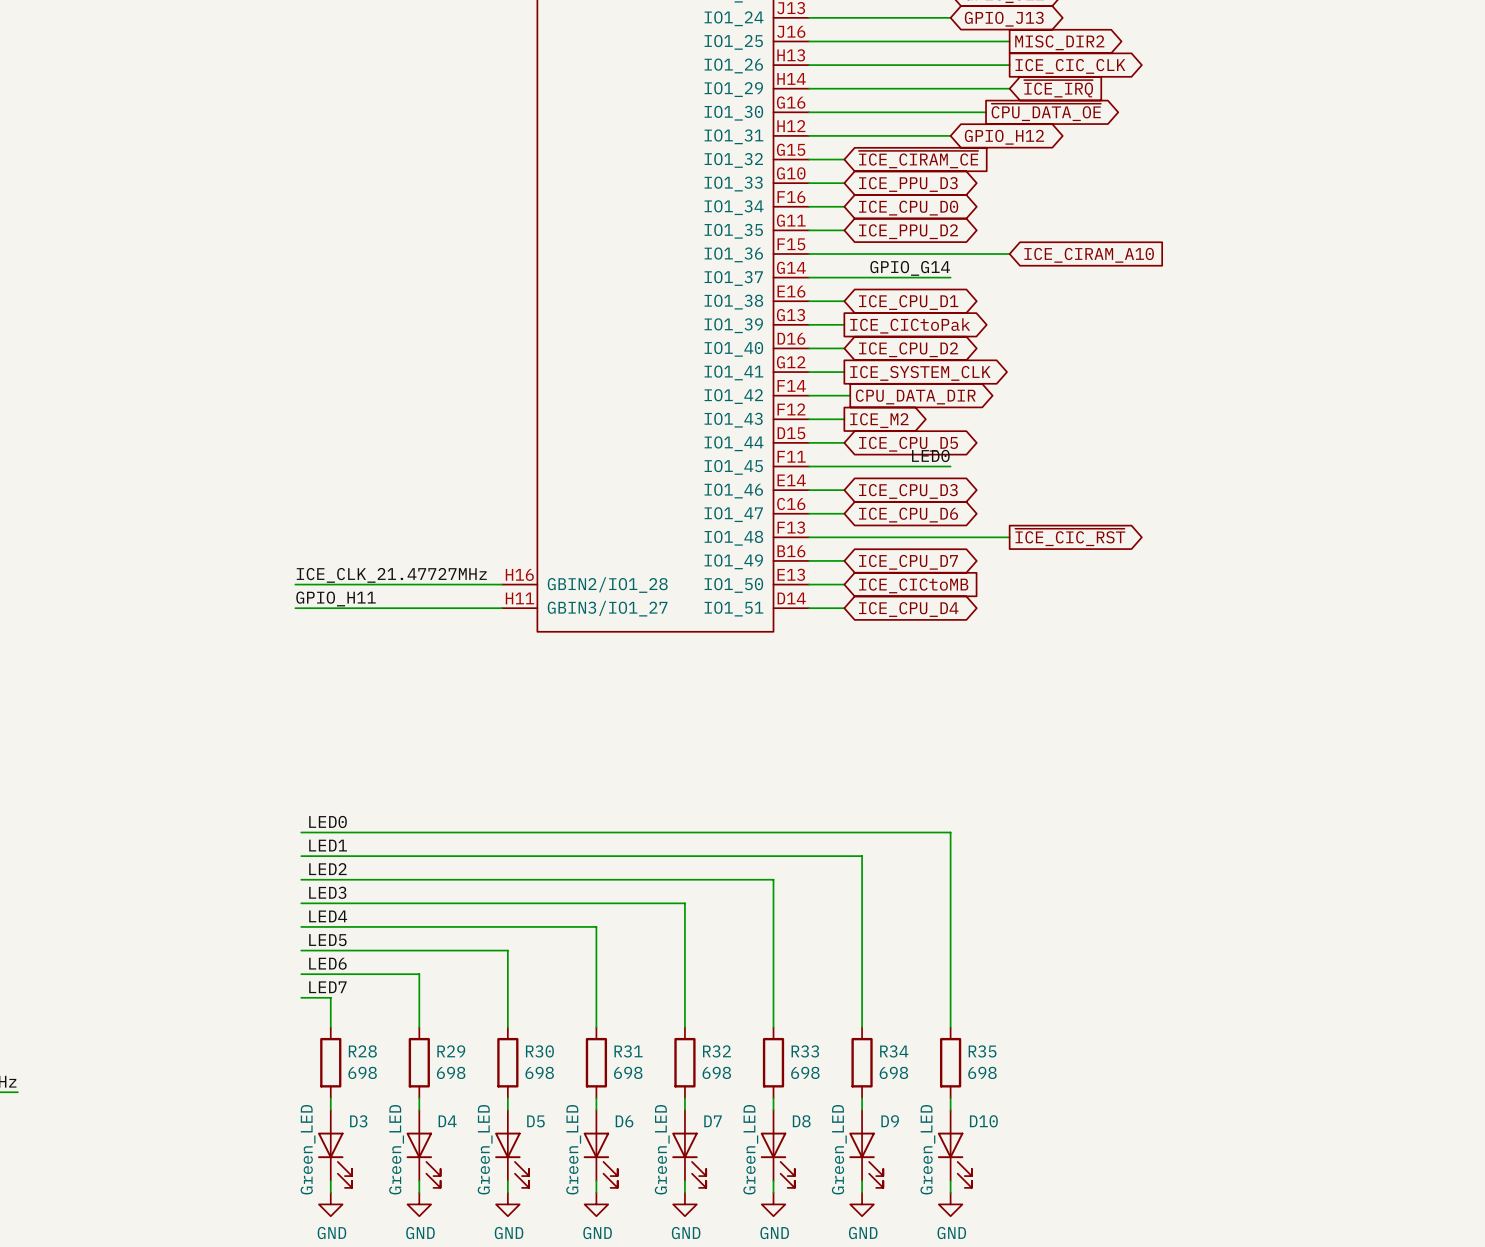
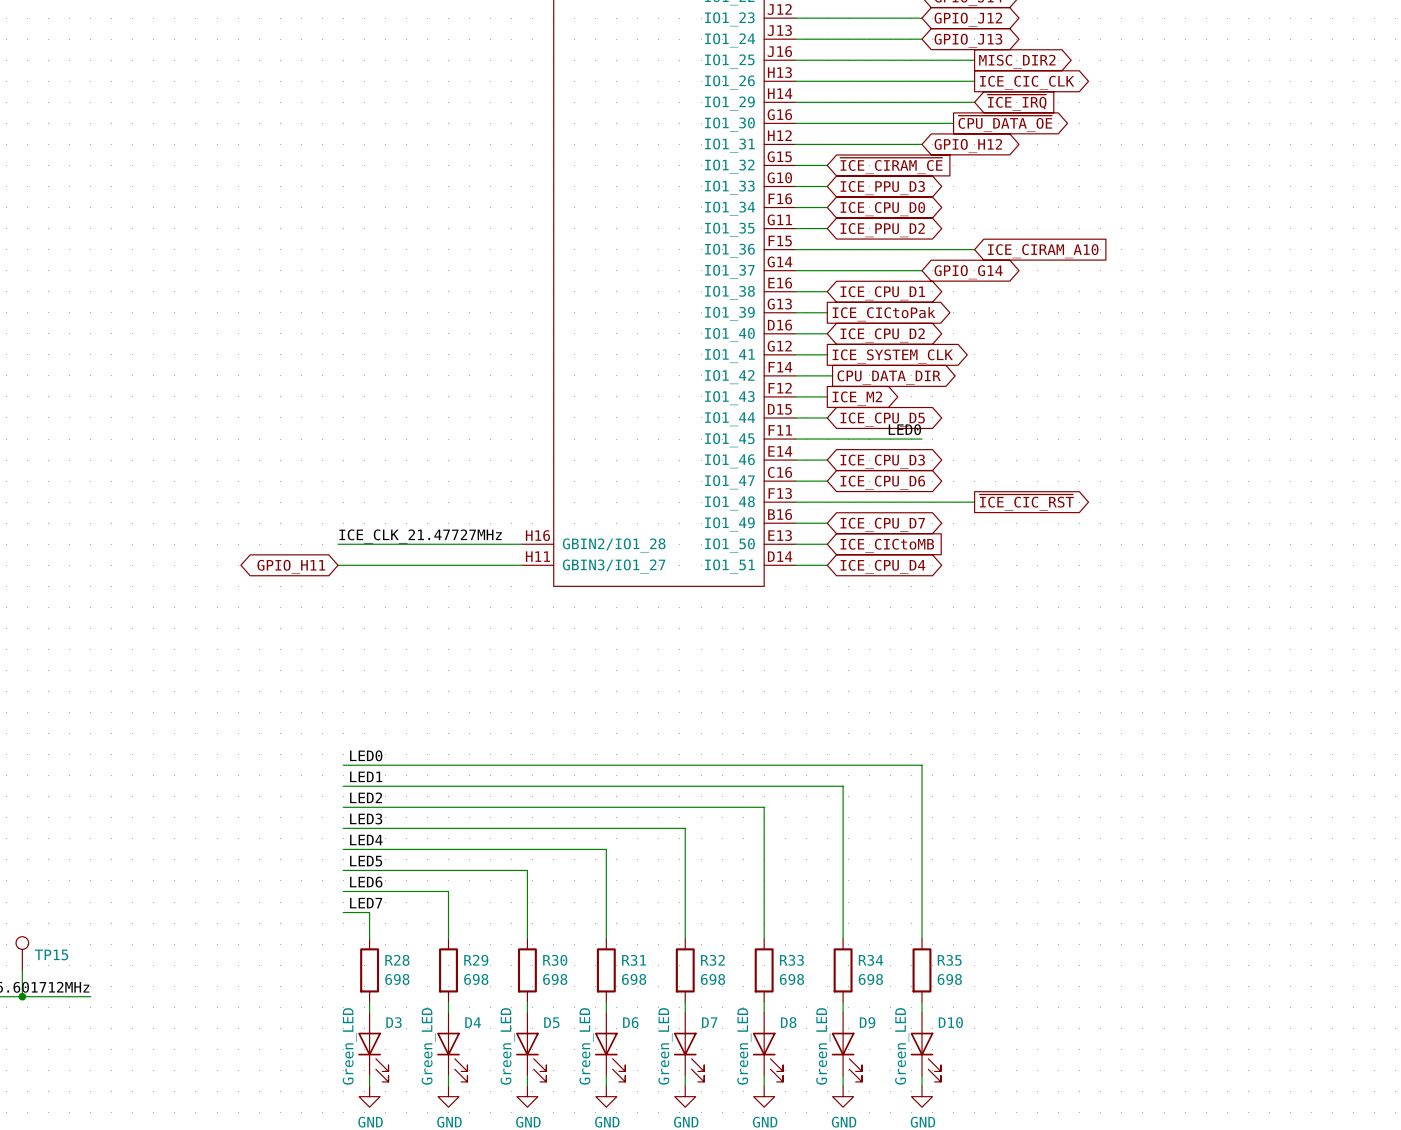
label: GPIO_G14 (910, 268) -> none
global label: none -> GPIO_G14 (968, 272)
label: GPIO_H11 (336, 598) -> none
global label: none -> GPIO_H11 (291, 566)

